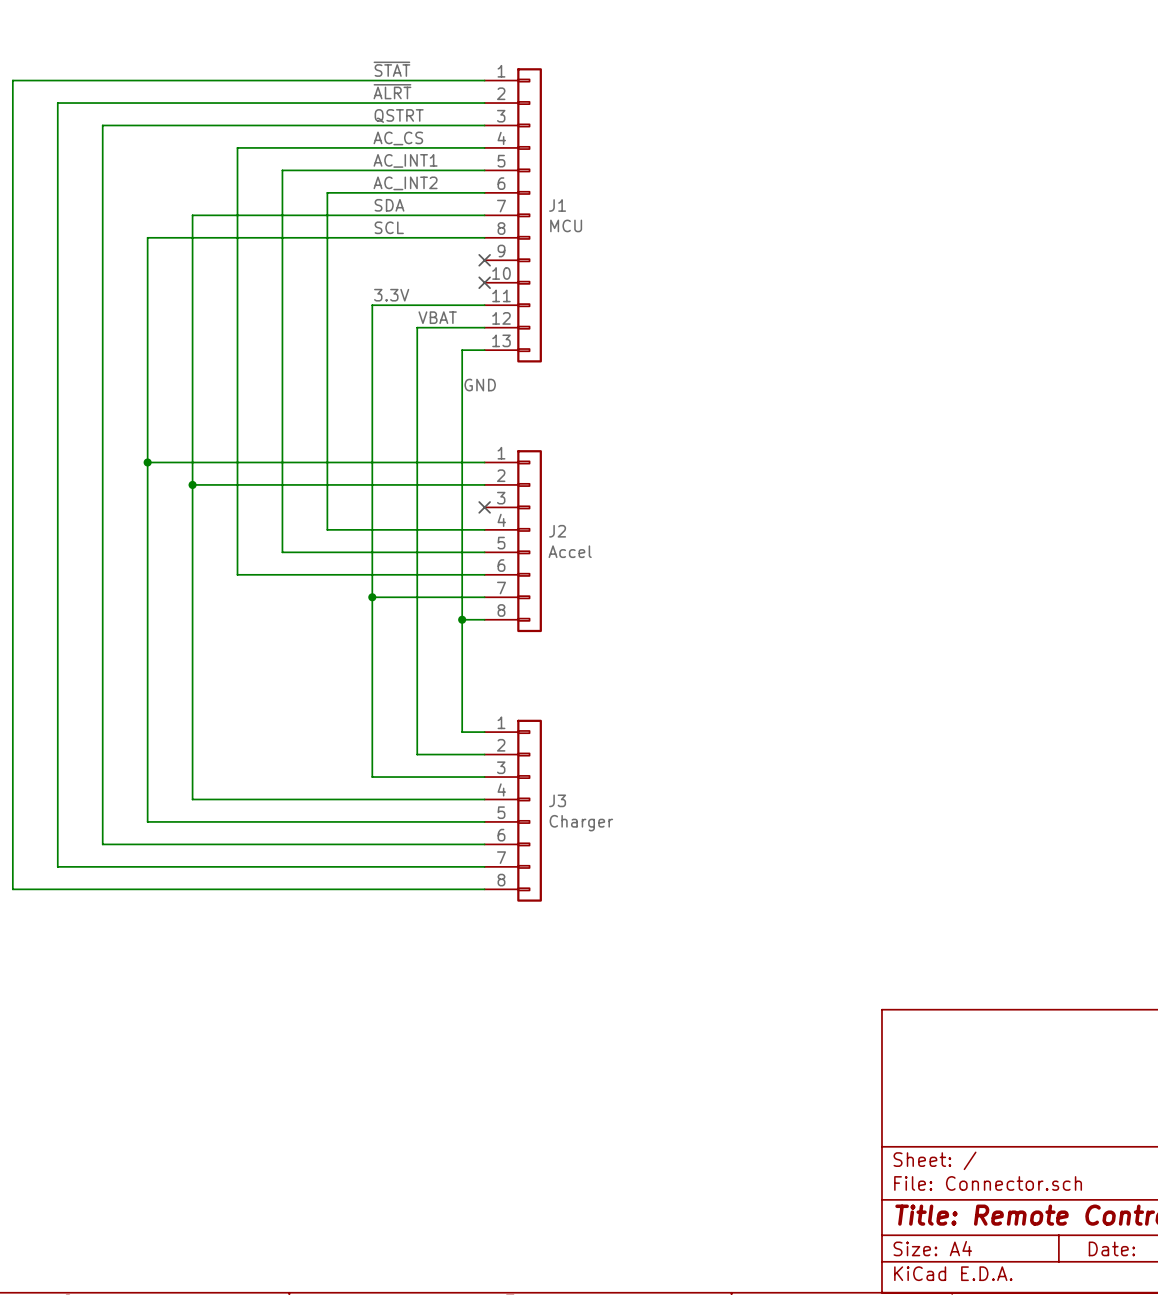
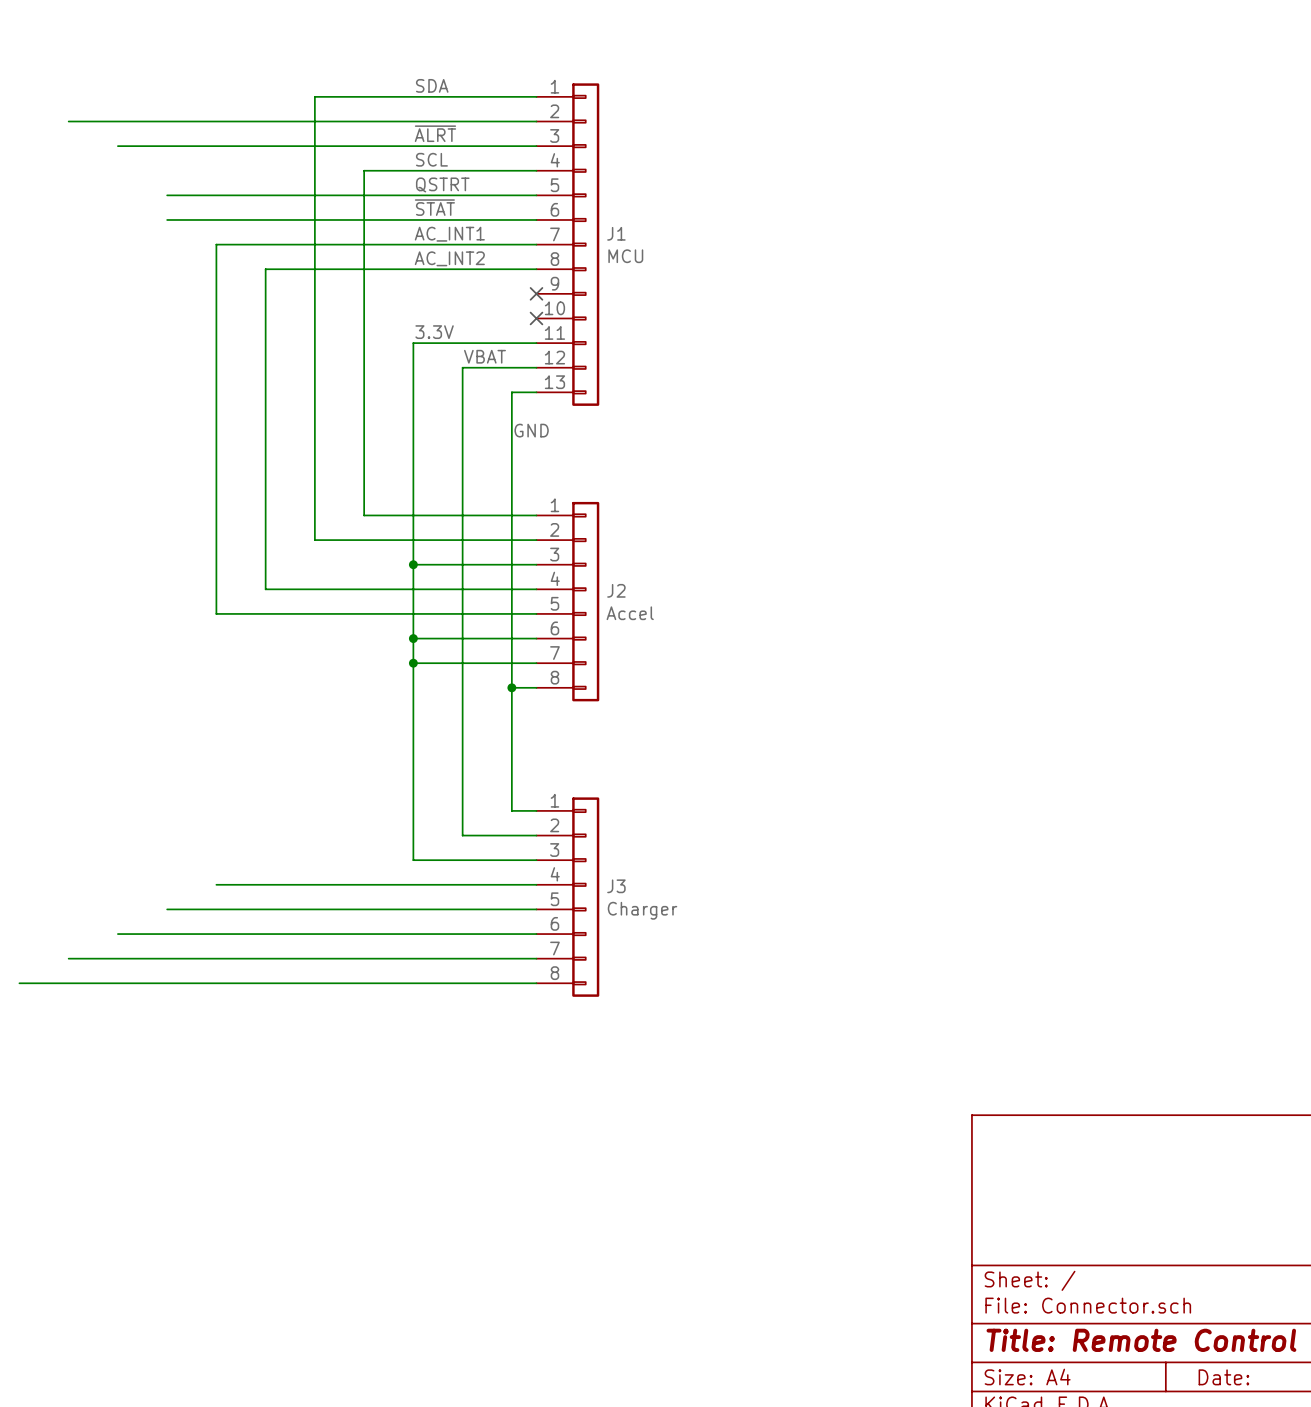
label: ~{STAT} (391, 69) -> SDA (432, 85)
wire: (282, 80) (12, 80) (12, 889) -> (314, 96) (314, 195) (167, 195)
label: ~{ALRT} (392, 91) -> none
wire: (57, 103) (57, 866) -> none
label: QSTRT (399, 115) -> ~{ALRT} (435, 133)
wire: (102, 125) (102, 844) -> none
label: AC_CS (398, 138) -> SCL (431, 159)
wire: (327, 147) (237, 147) (237, 237) (147, 237) (147, 821) -> (364, 170) (364, 219) (167, 219)
label: AC_INT1 (405, 160) -> QSTRT (442, 184)
label: AC_INT2 (405, 183) -> ~{STAT} (434, 207)
label: SDA (389, 205) -> AC_INT1 (449, 234)
label: SCL (389, 227) -> AC_INT2 (449, 258)
wire: (147, 462) (327, 462) (327, 529) -> none
junction: (147, 462) -> none
wire: (192, 484) (282, 484) (282, 552) -> (216, 613) (314, 613)
junction: (192, 484) -> none
wire: none -> (413, 564) (536, 564)
junction: none -> (413, 564)
no-connect mark: (484, 507) -> none
wire: (237, 529) (237, 574) (372, 574) -> (265, 589) (364, 589)
wire: (192, 552) (192, 799) -> none
junction: none -> (413, 638)

